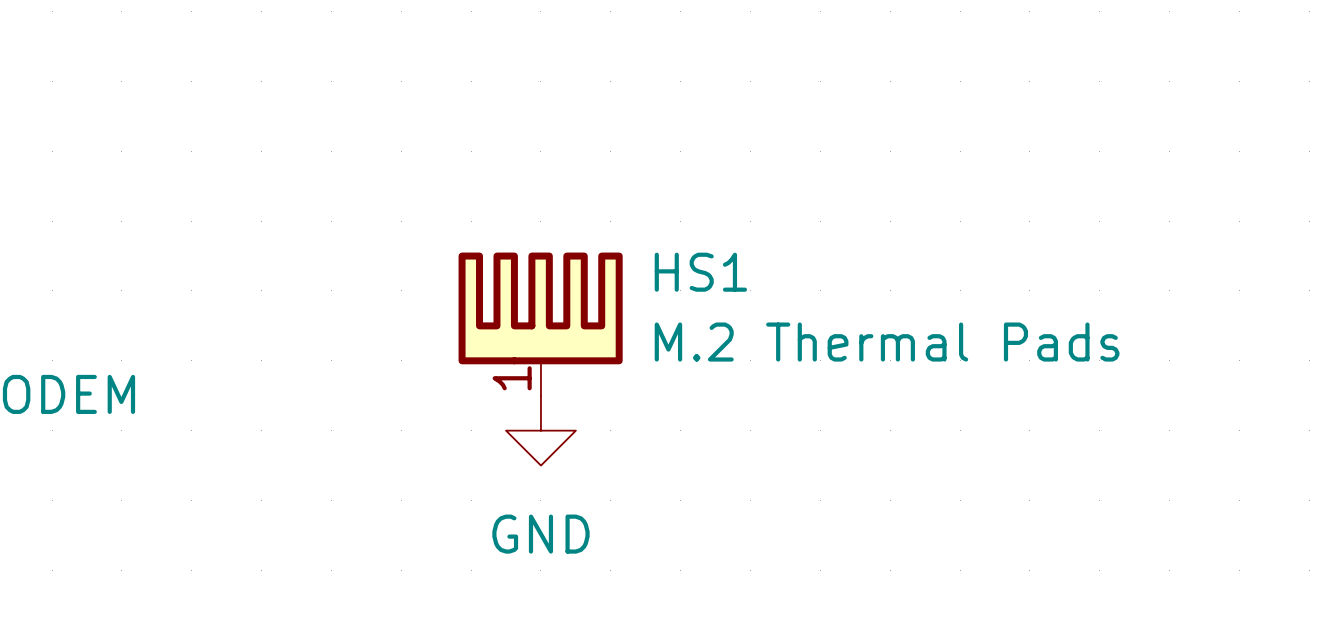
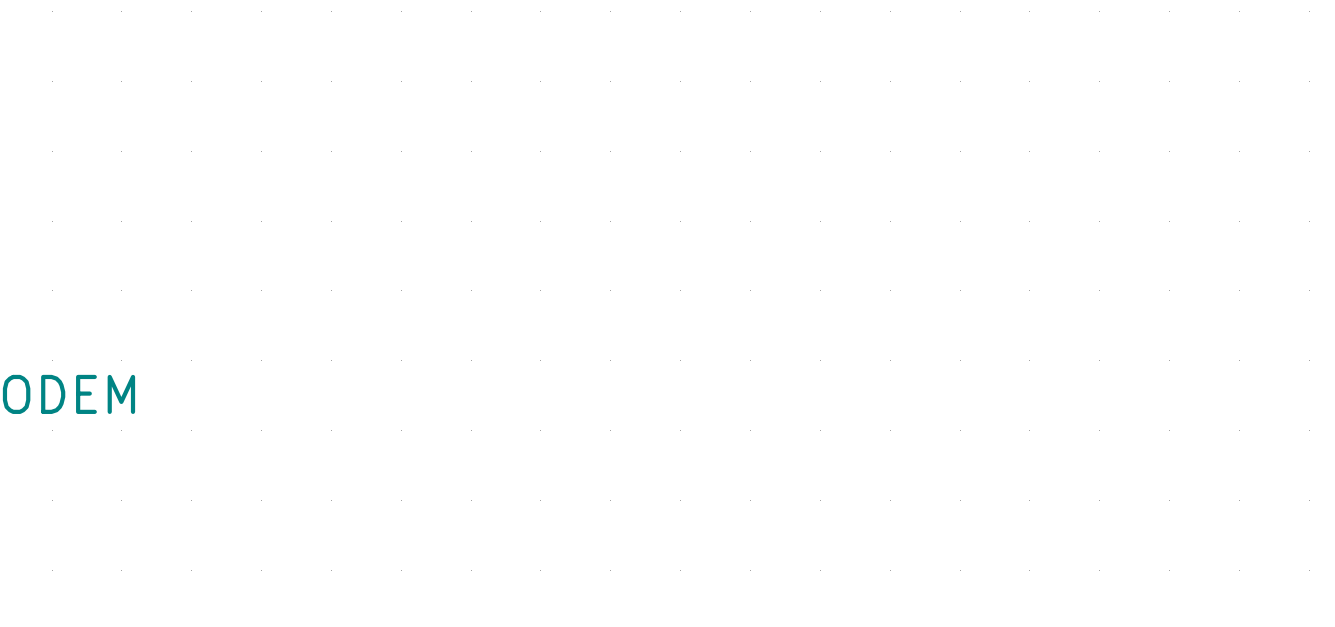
HS1: M.2 Thermal Pads (540, 324) -> none
power symbol: GND (540, 430) -> none

